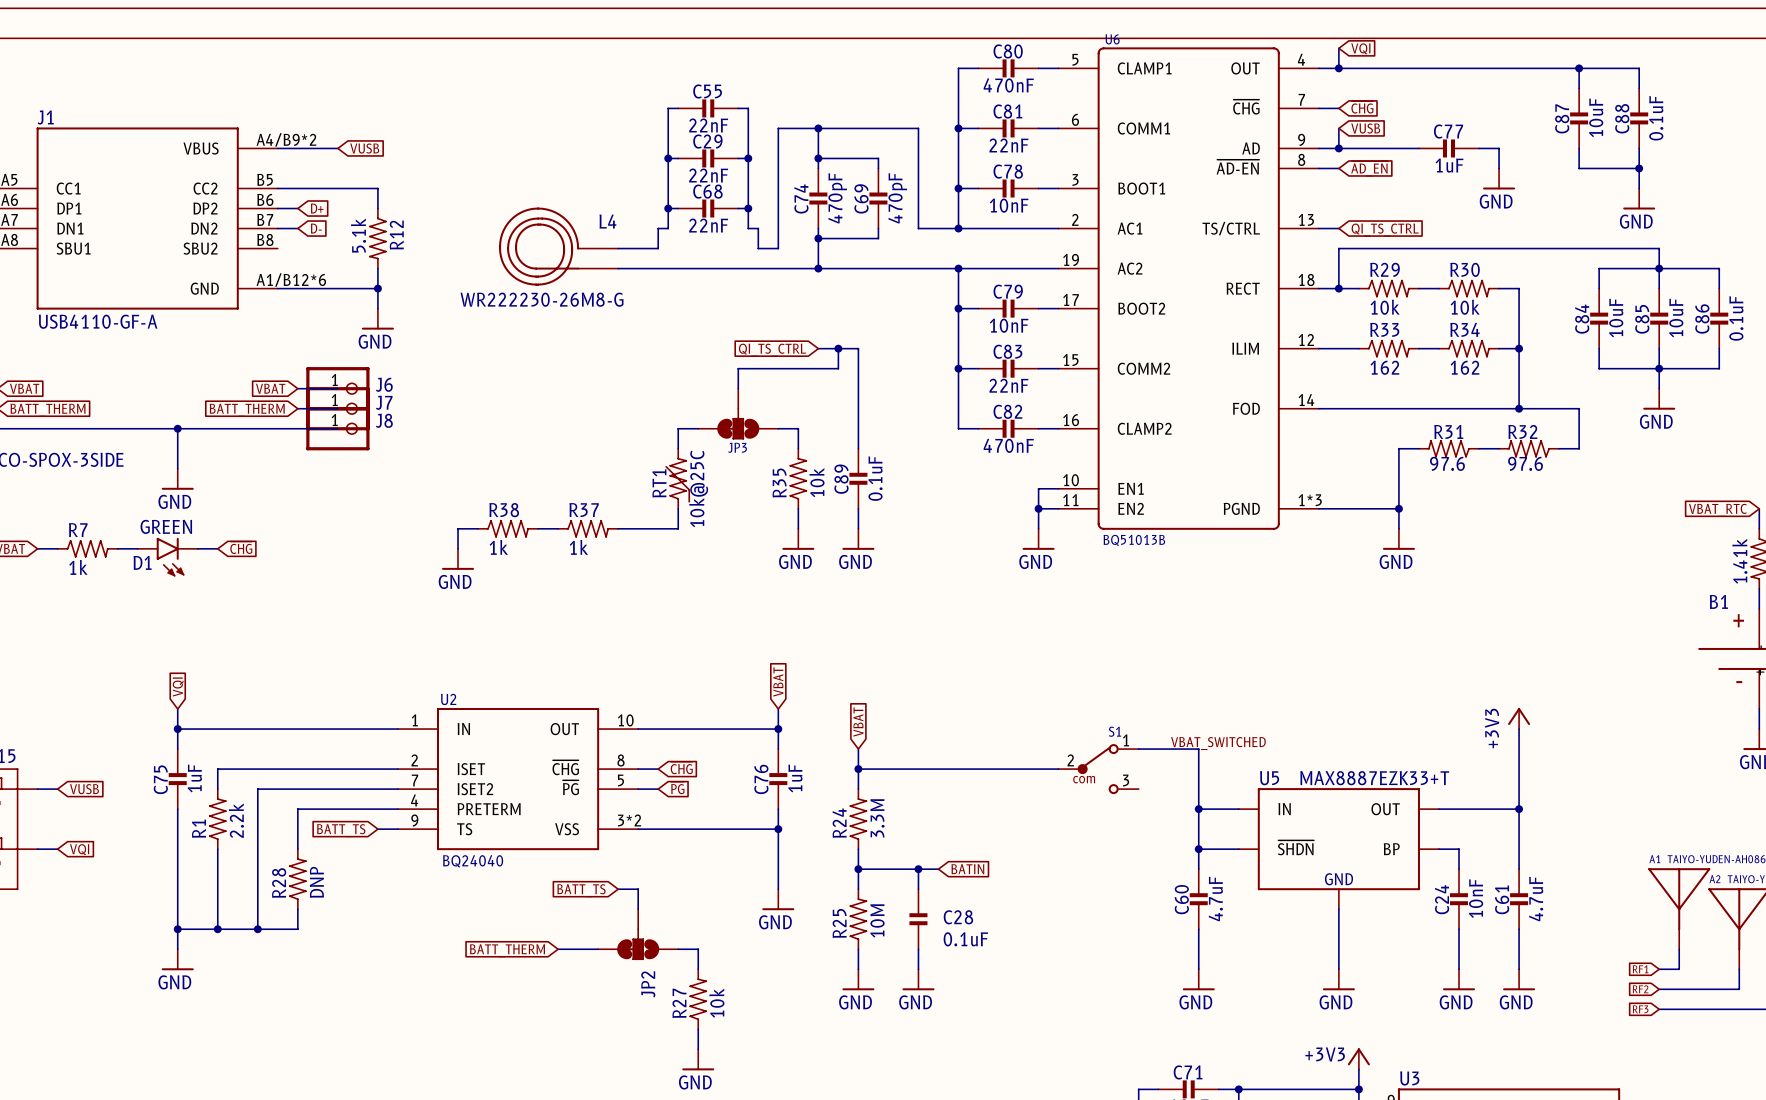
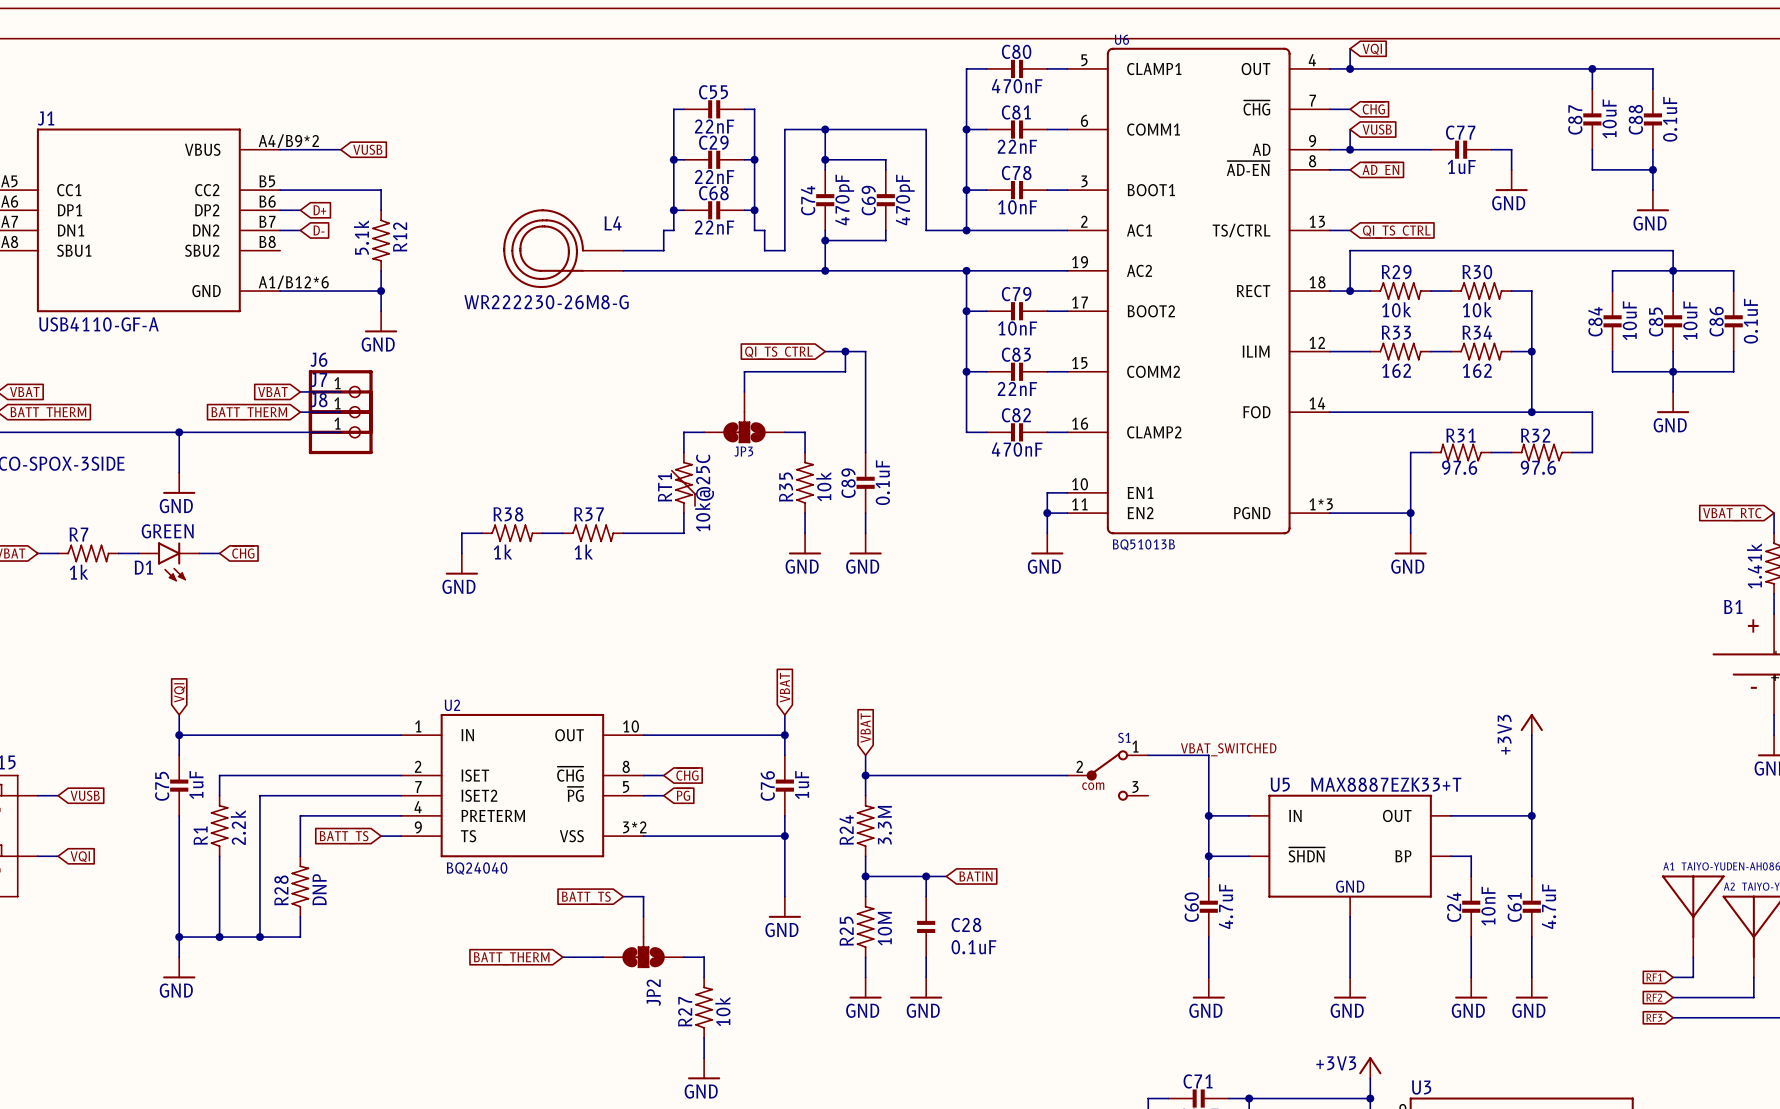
J6 name position: J6 (384, 384) -> J6 (318, 359)
J7 name position: J7 (384, 402) -> J7 (318, 379)
J8 name position: J8 (384, 420) -> J8 (318, 400)

